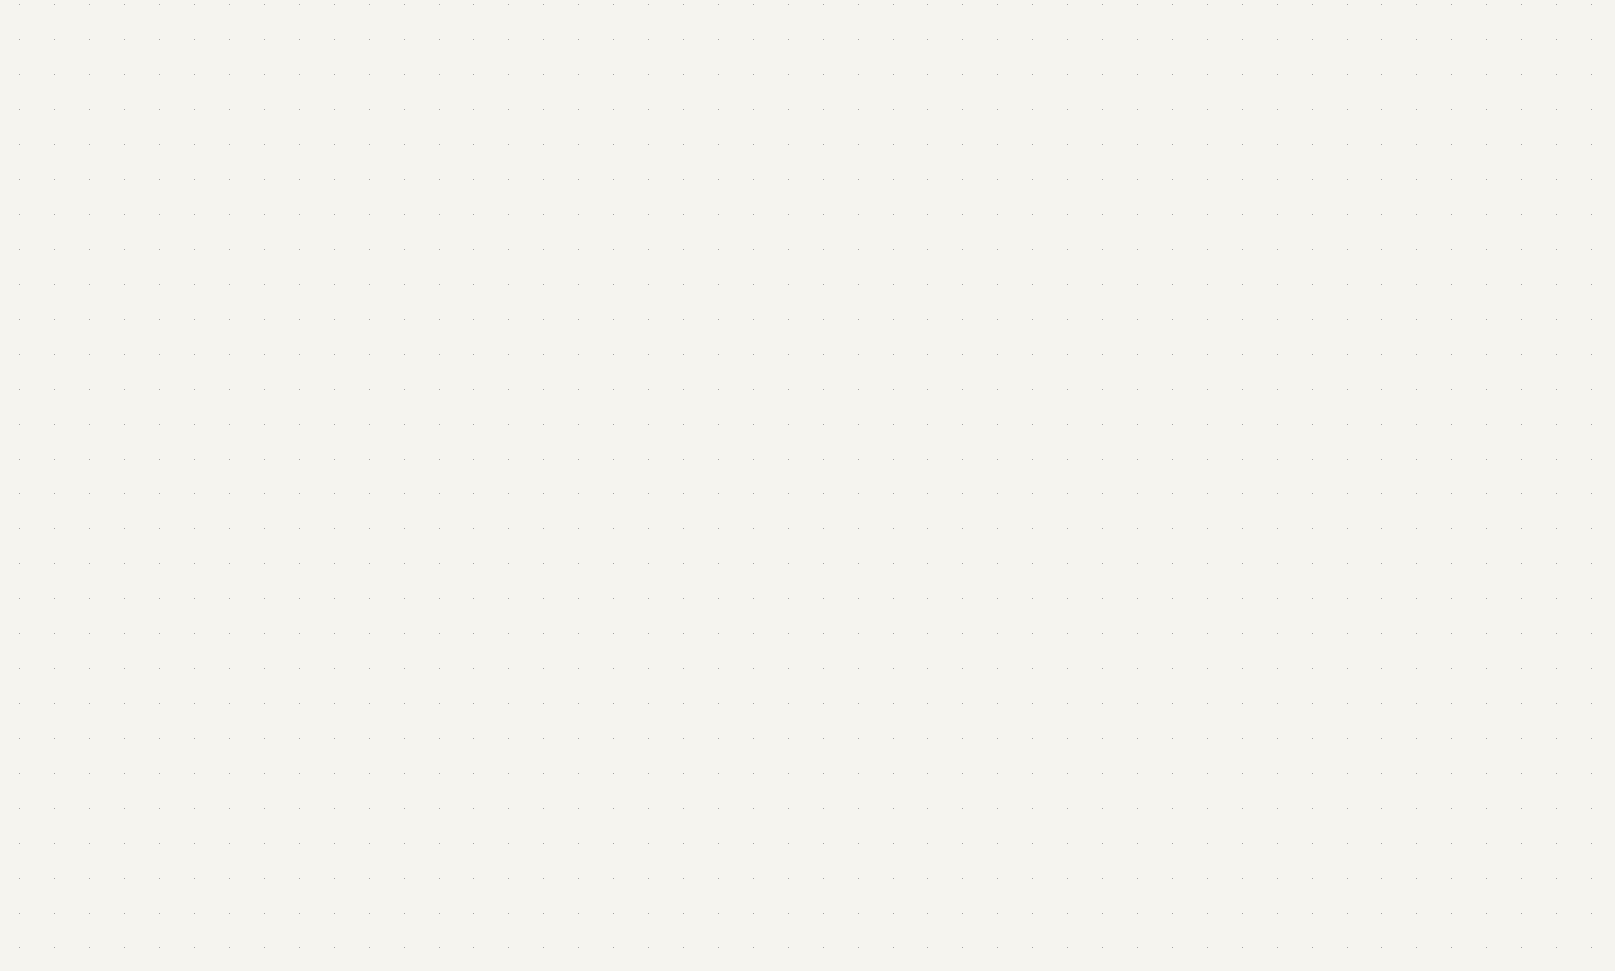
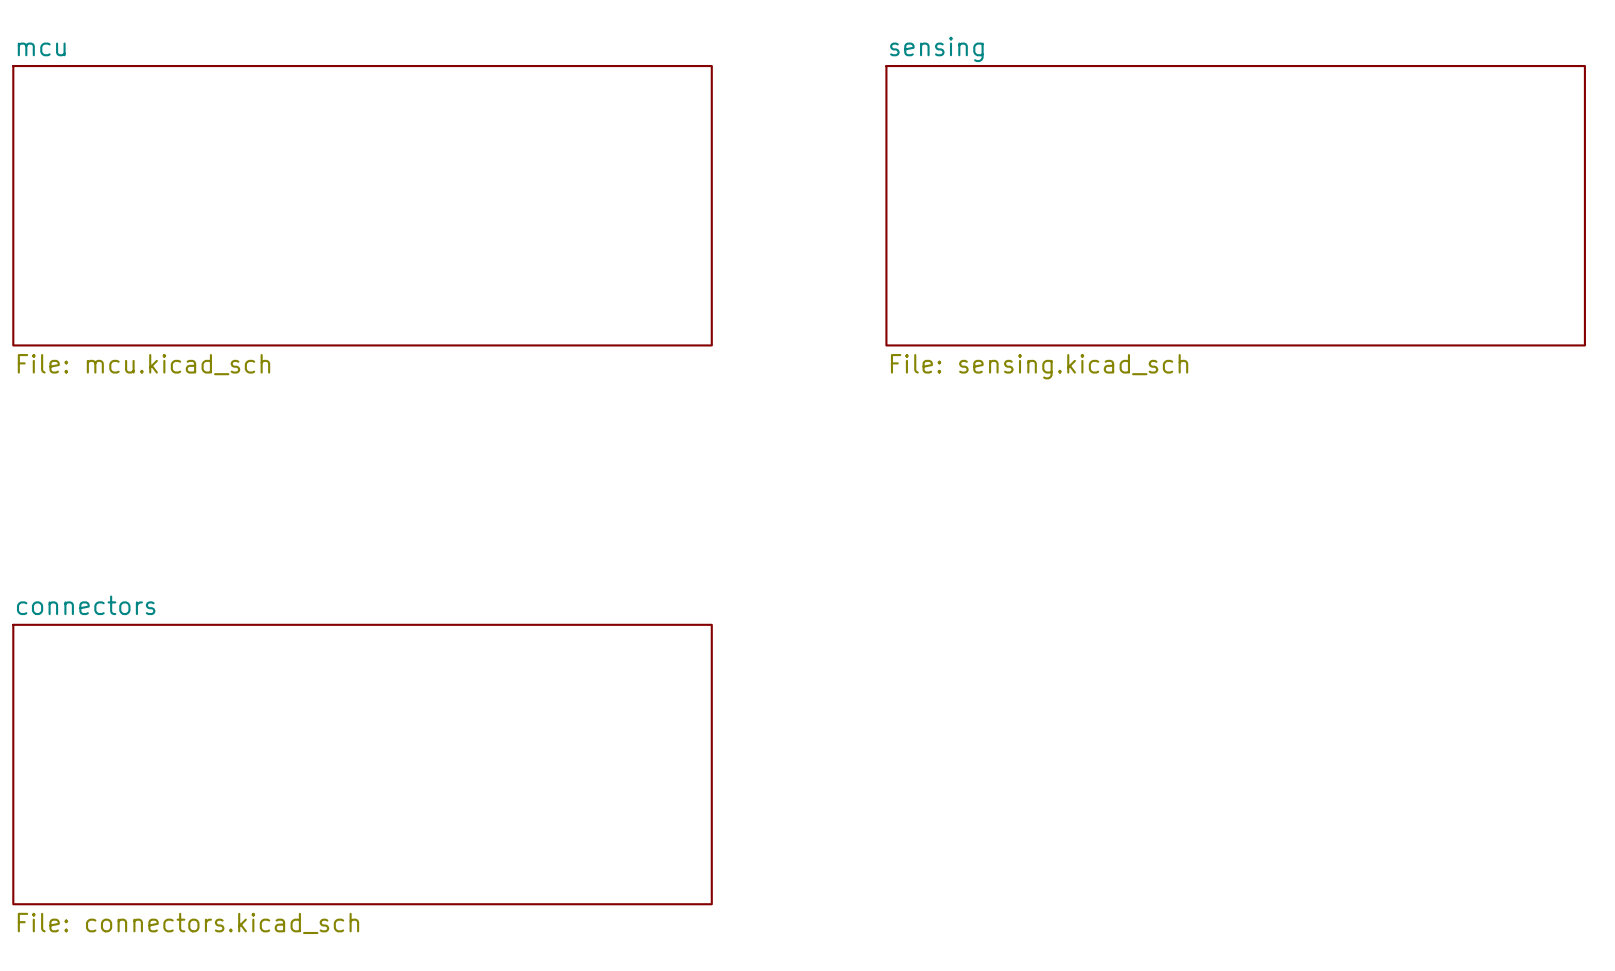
sheet mcu: none -> File: mcu.kicad_sch (362, 205)
sheet sensing: none -> File: sensing.kicad_sch (1235, 205)
sheet connectors: none -> File: connectors.kicad_sch (362, 764)

